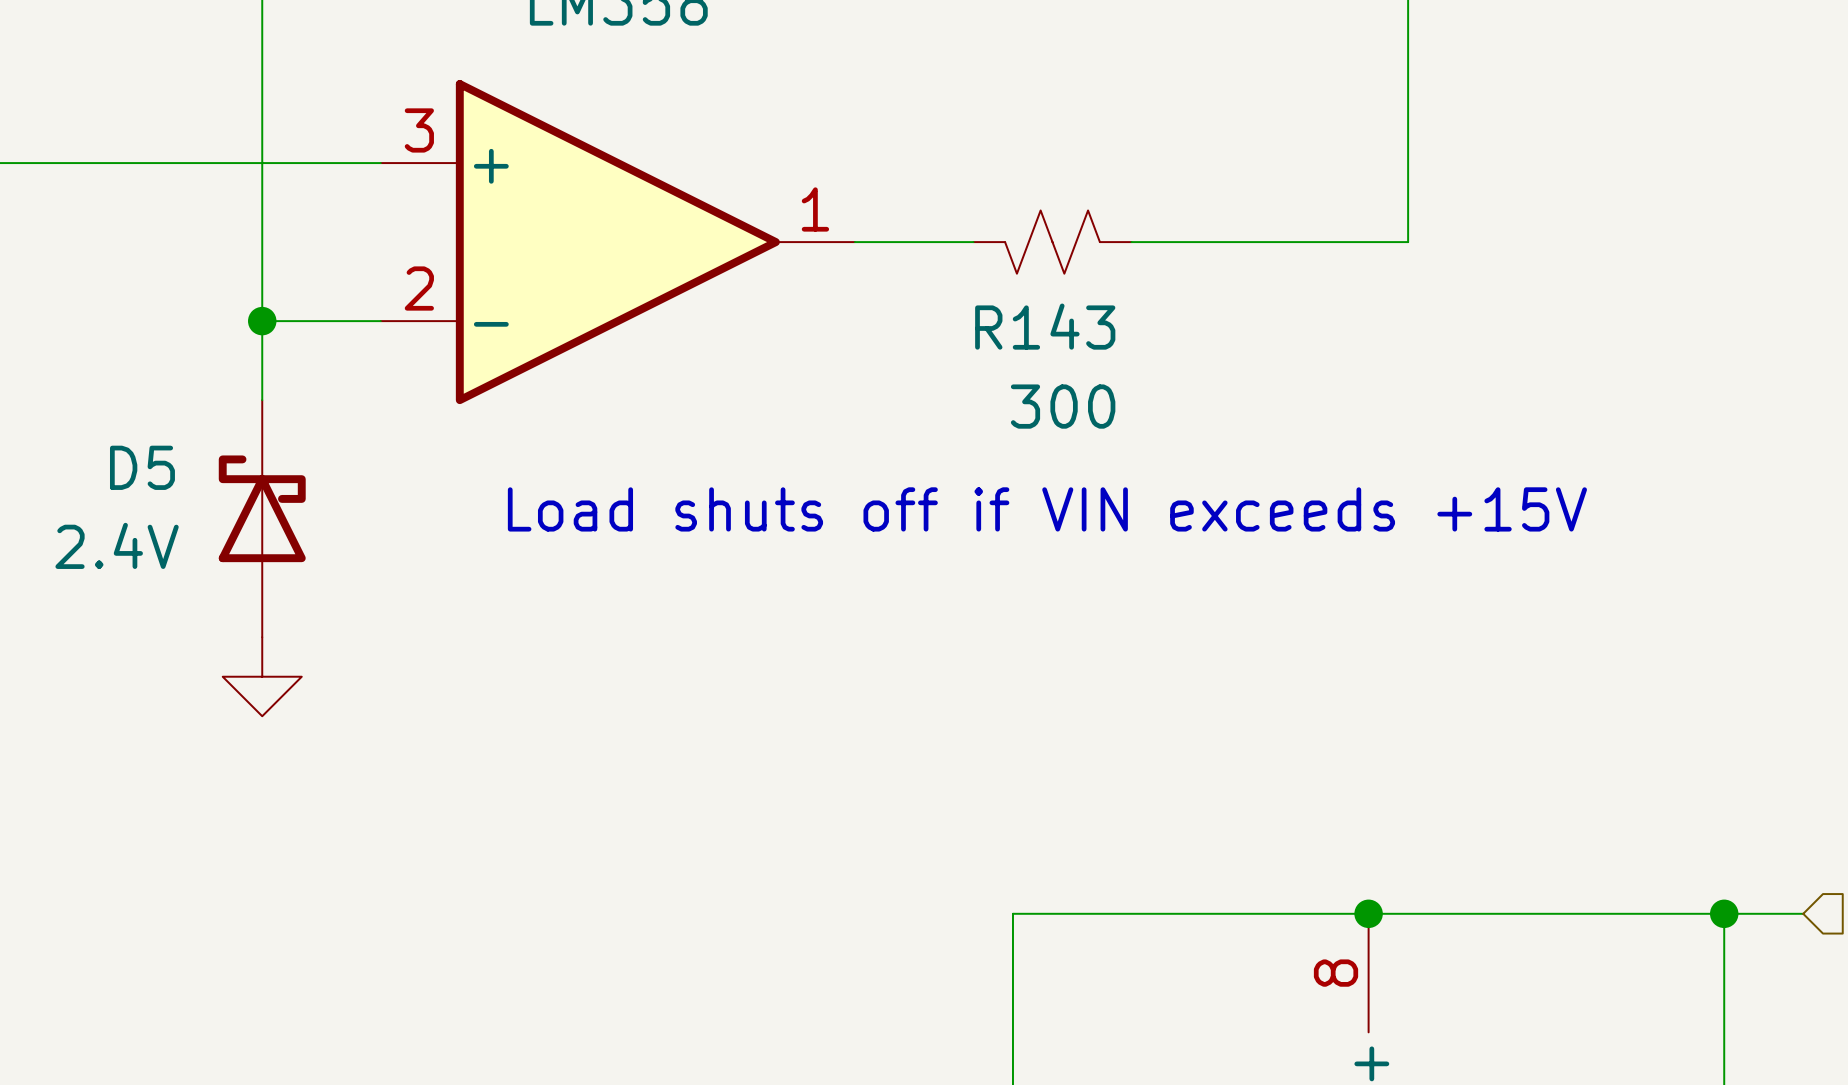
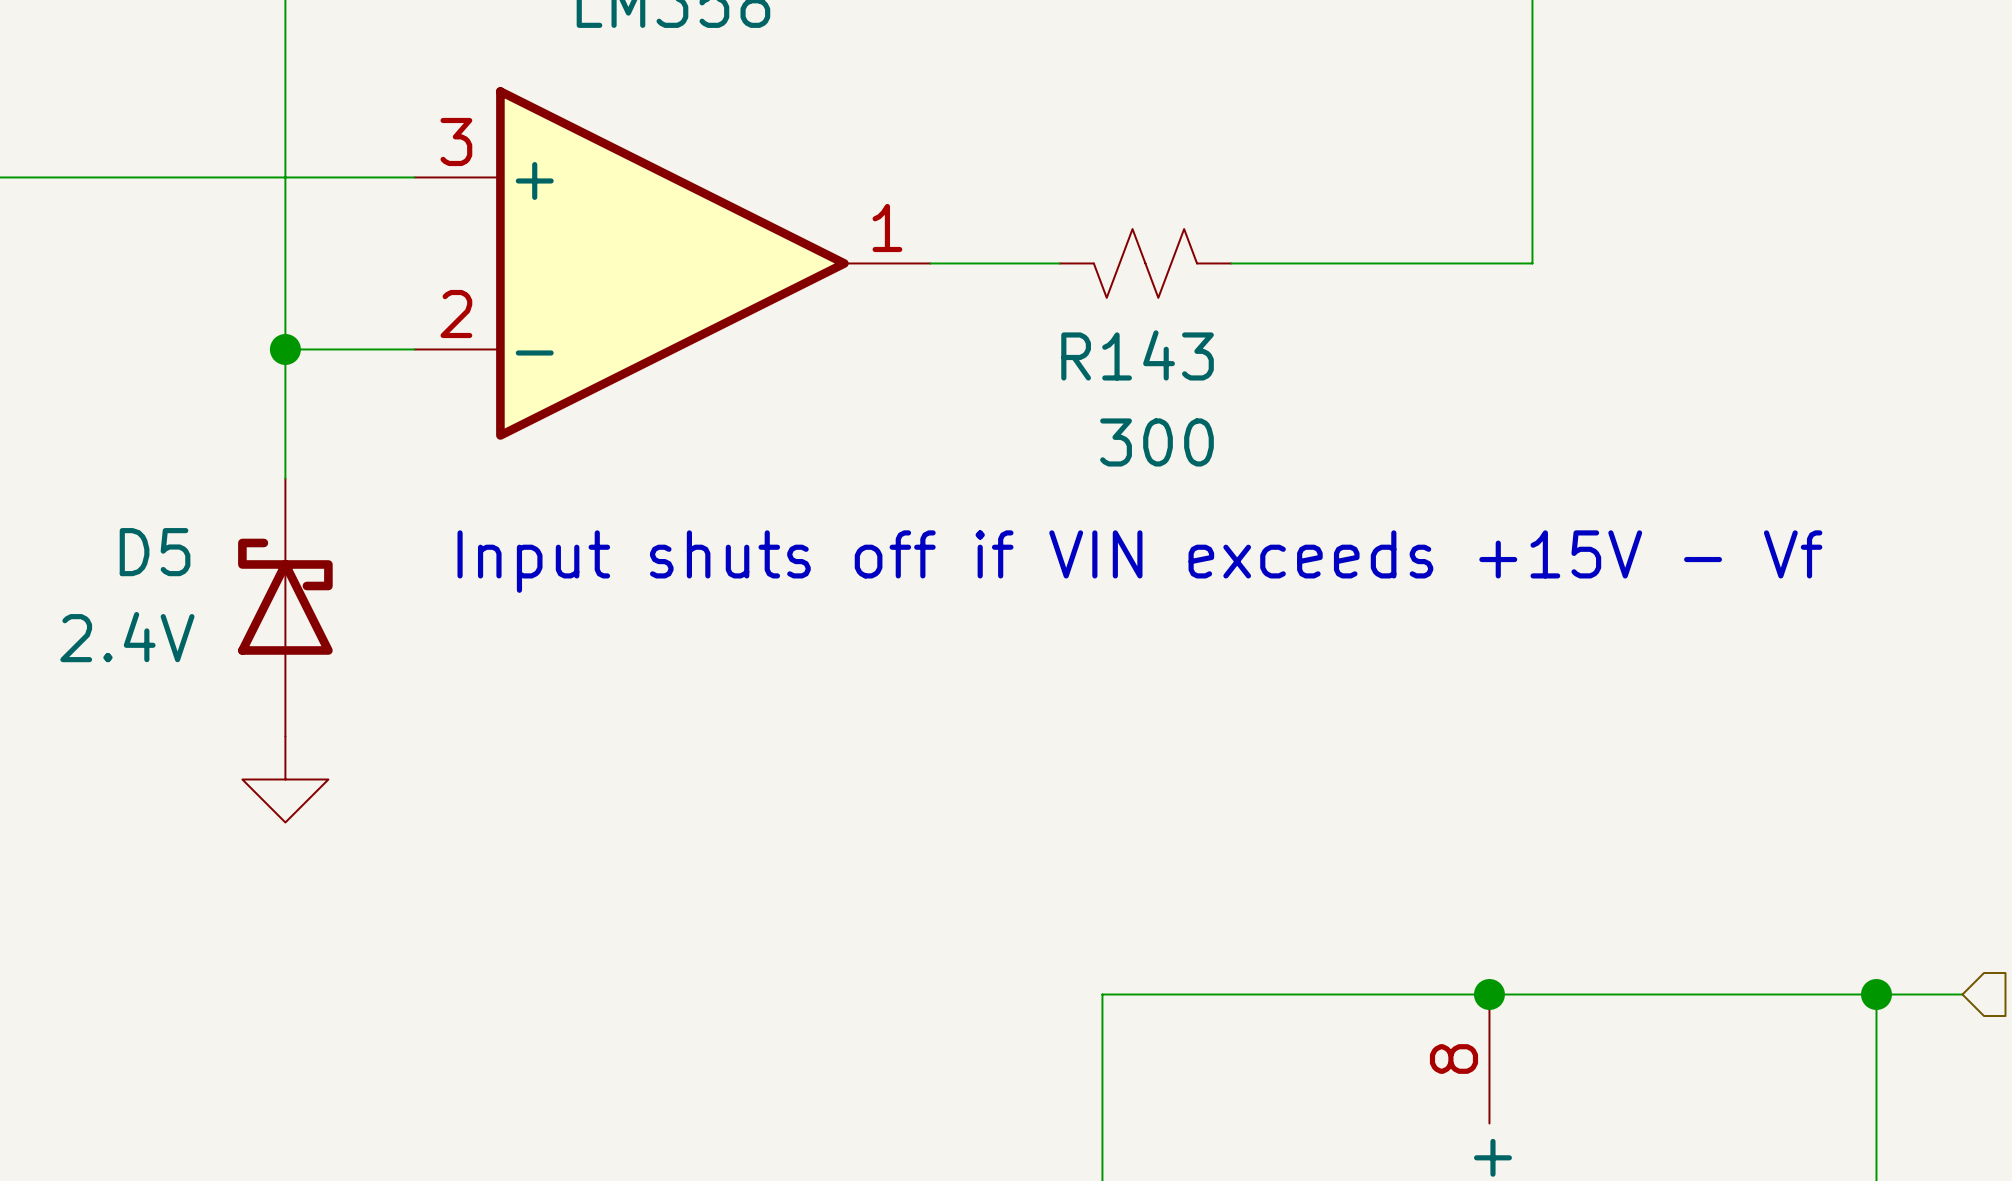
text: Load shuts off if VIN exceeds +15V (1047, 509) -> Input shuts off if VIN exceeds +15V - Vf (1139, 561)
D5 position: (262, 518) -> (285, 607)
power symbol position: (262, 676) -> (285, 779)

